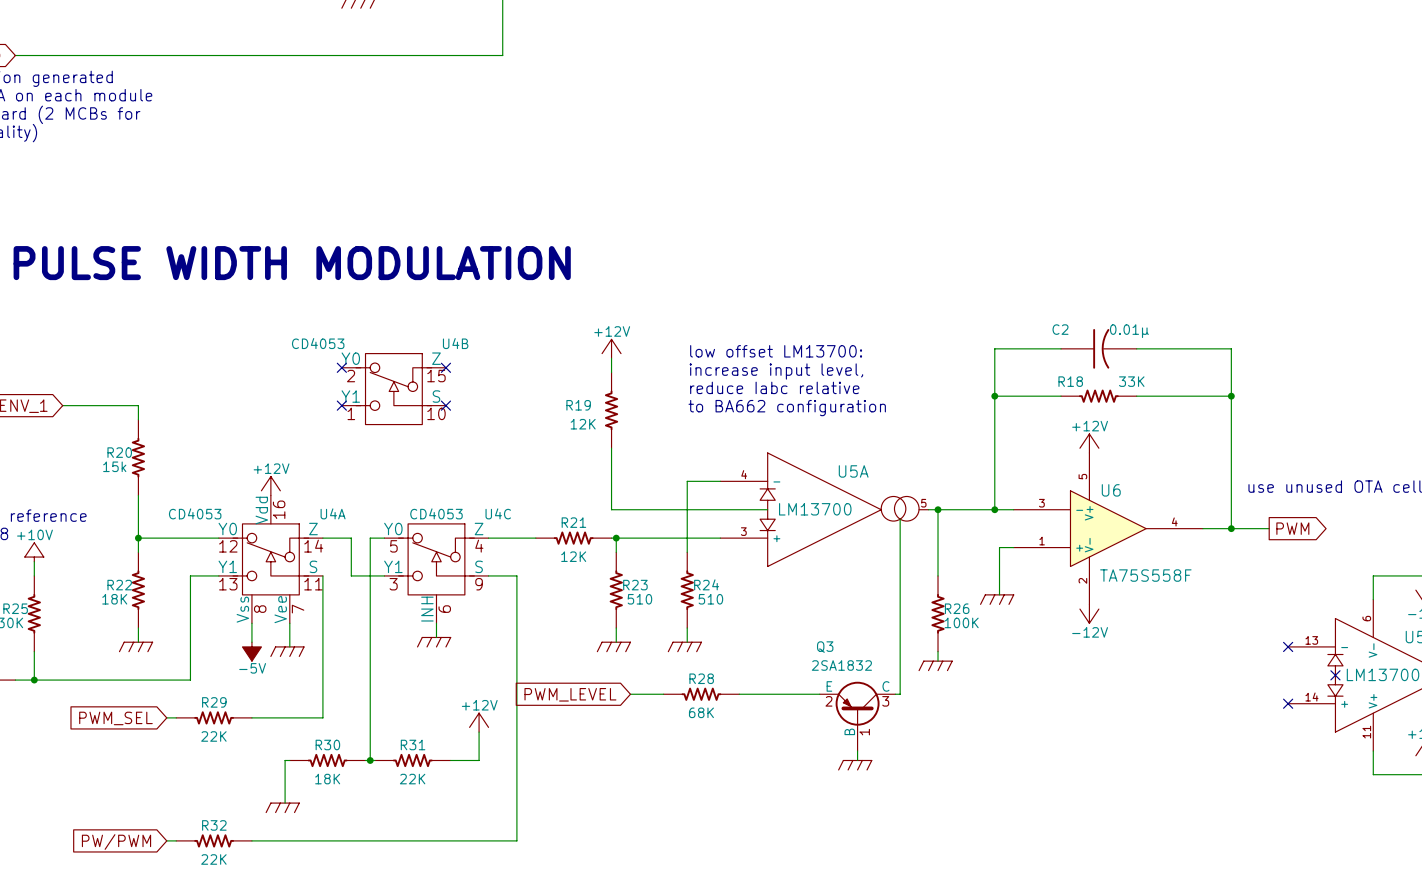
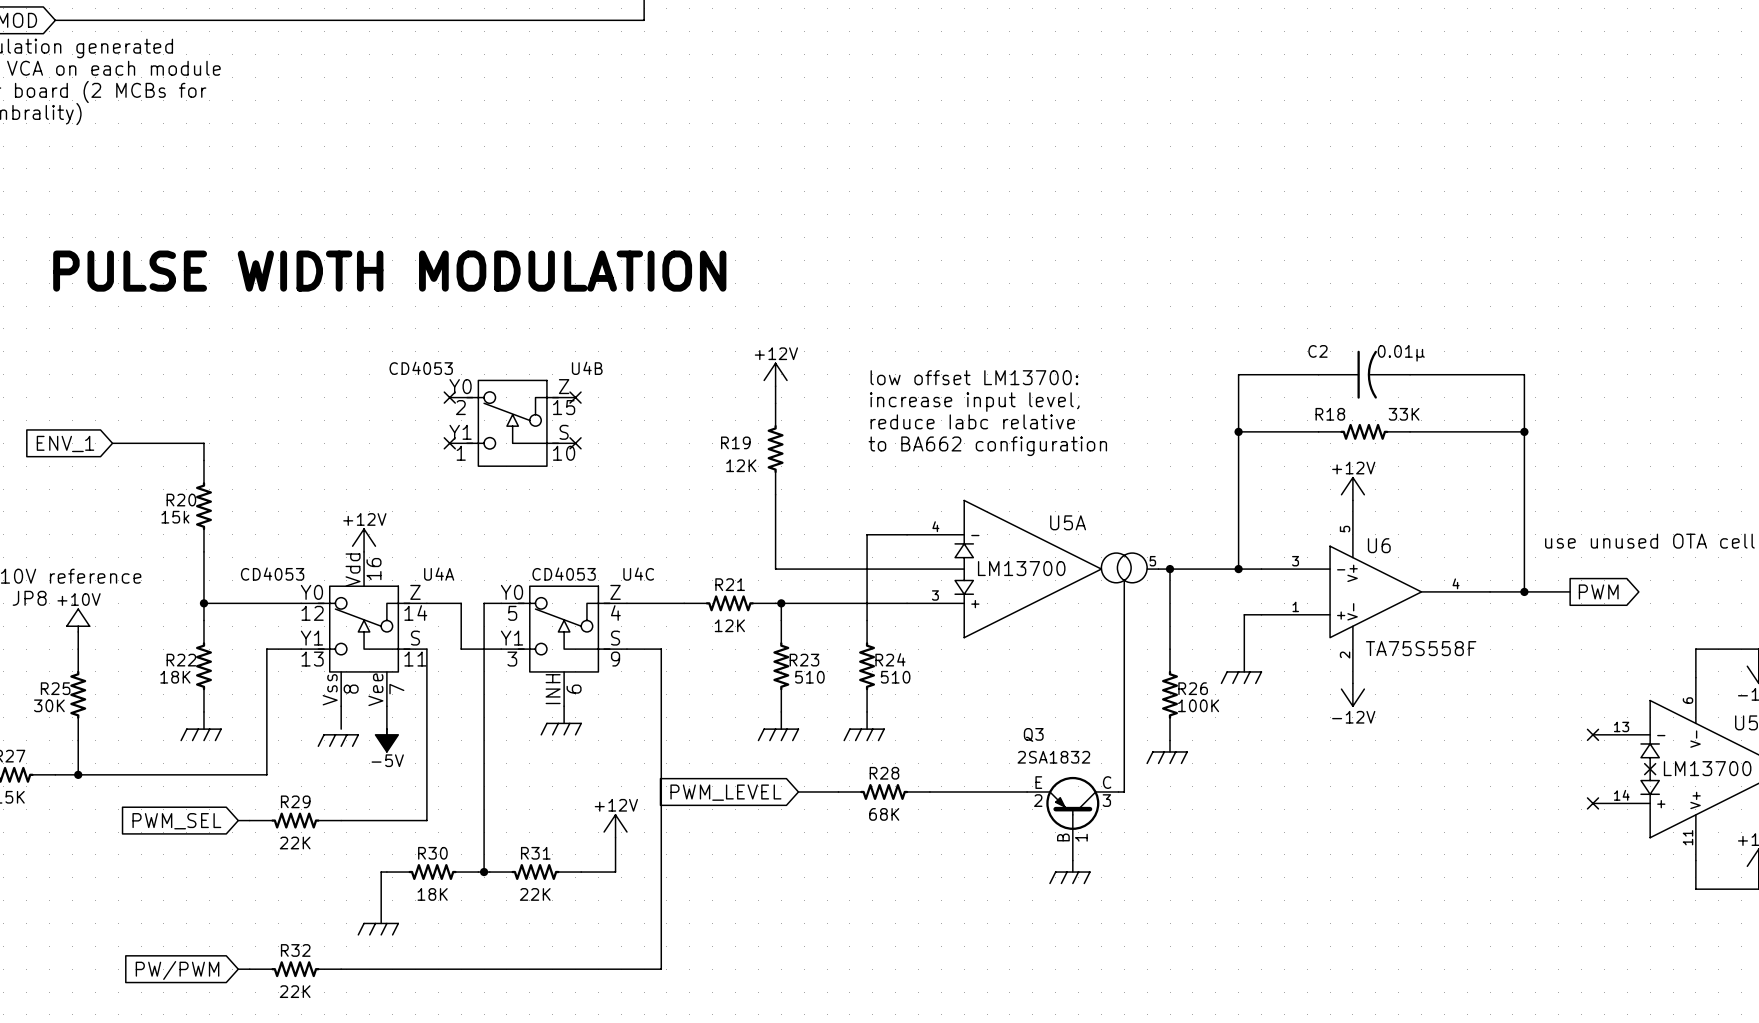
power symbol shape: [242, 642, 262, 662] -> [318, 734, 359, 747]
power symbol shape: [270, 646, 305, 657] -> [375, 729, 399, 752]
power symbol text: -5V (252, 668) -> none
power symbol text: none -> -5V (387, 760)

